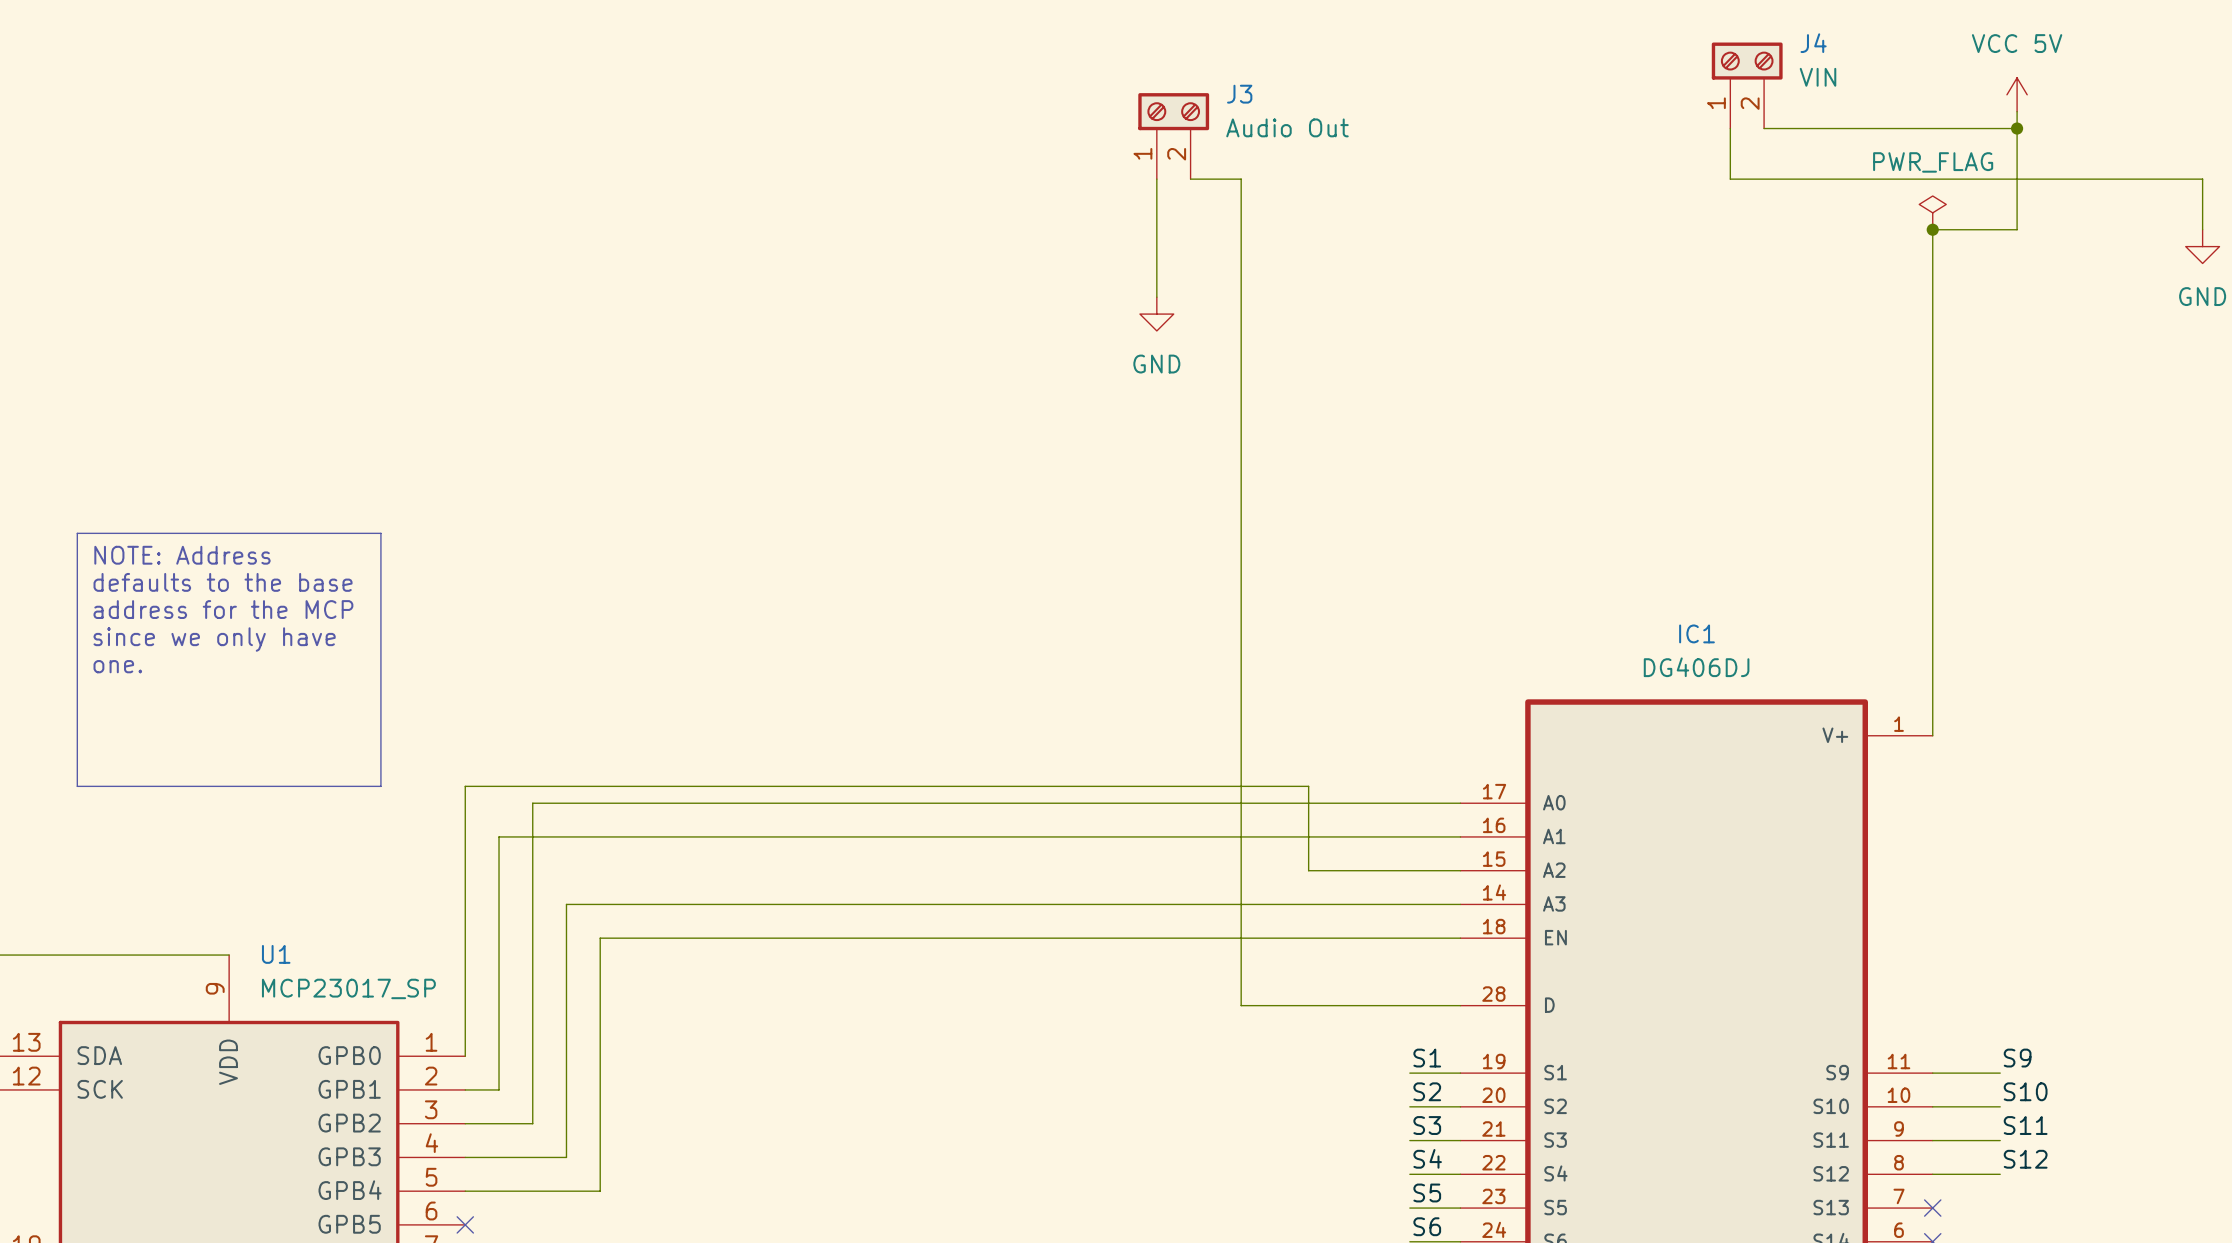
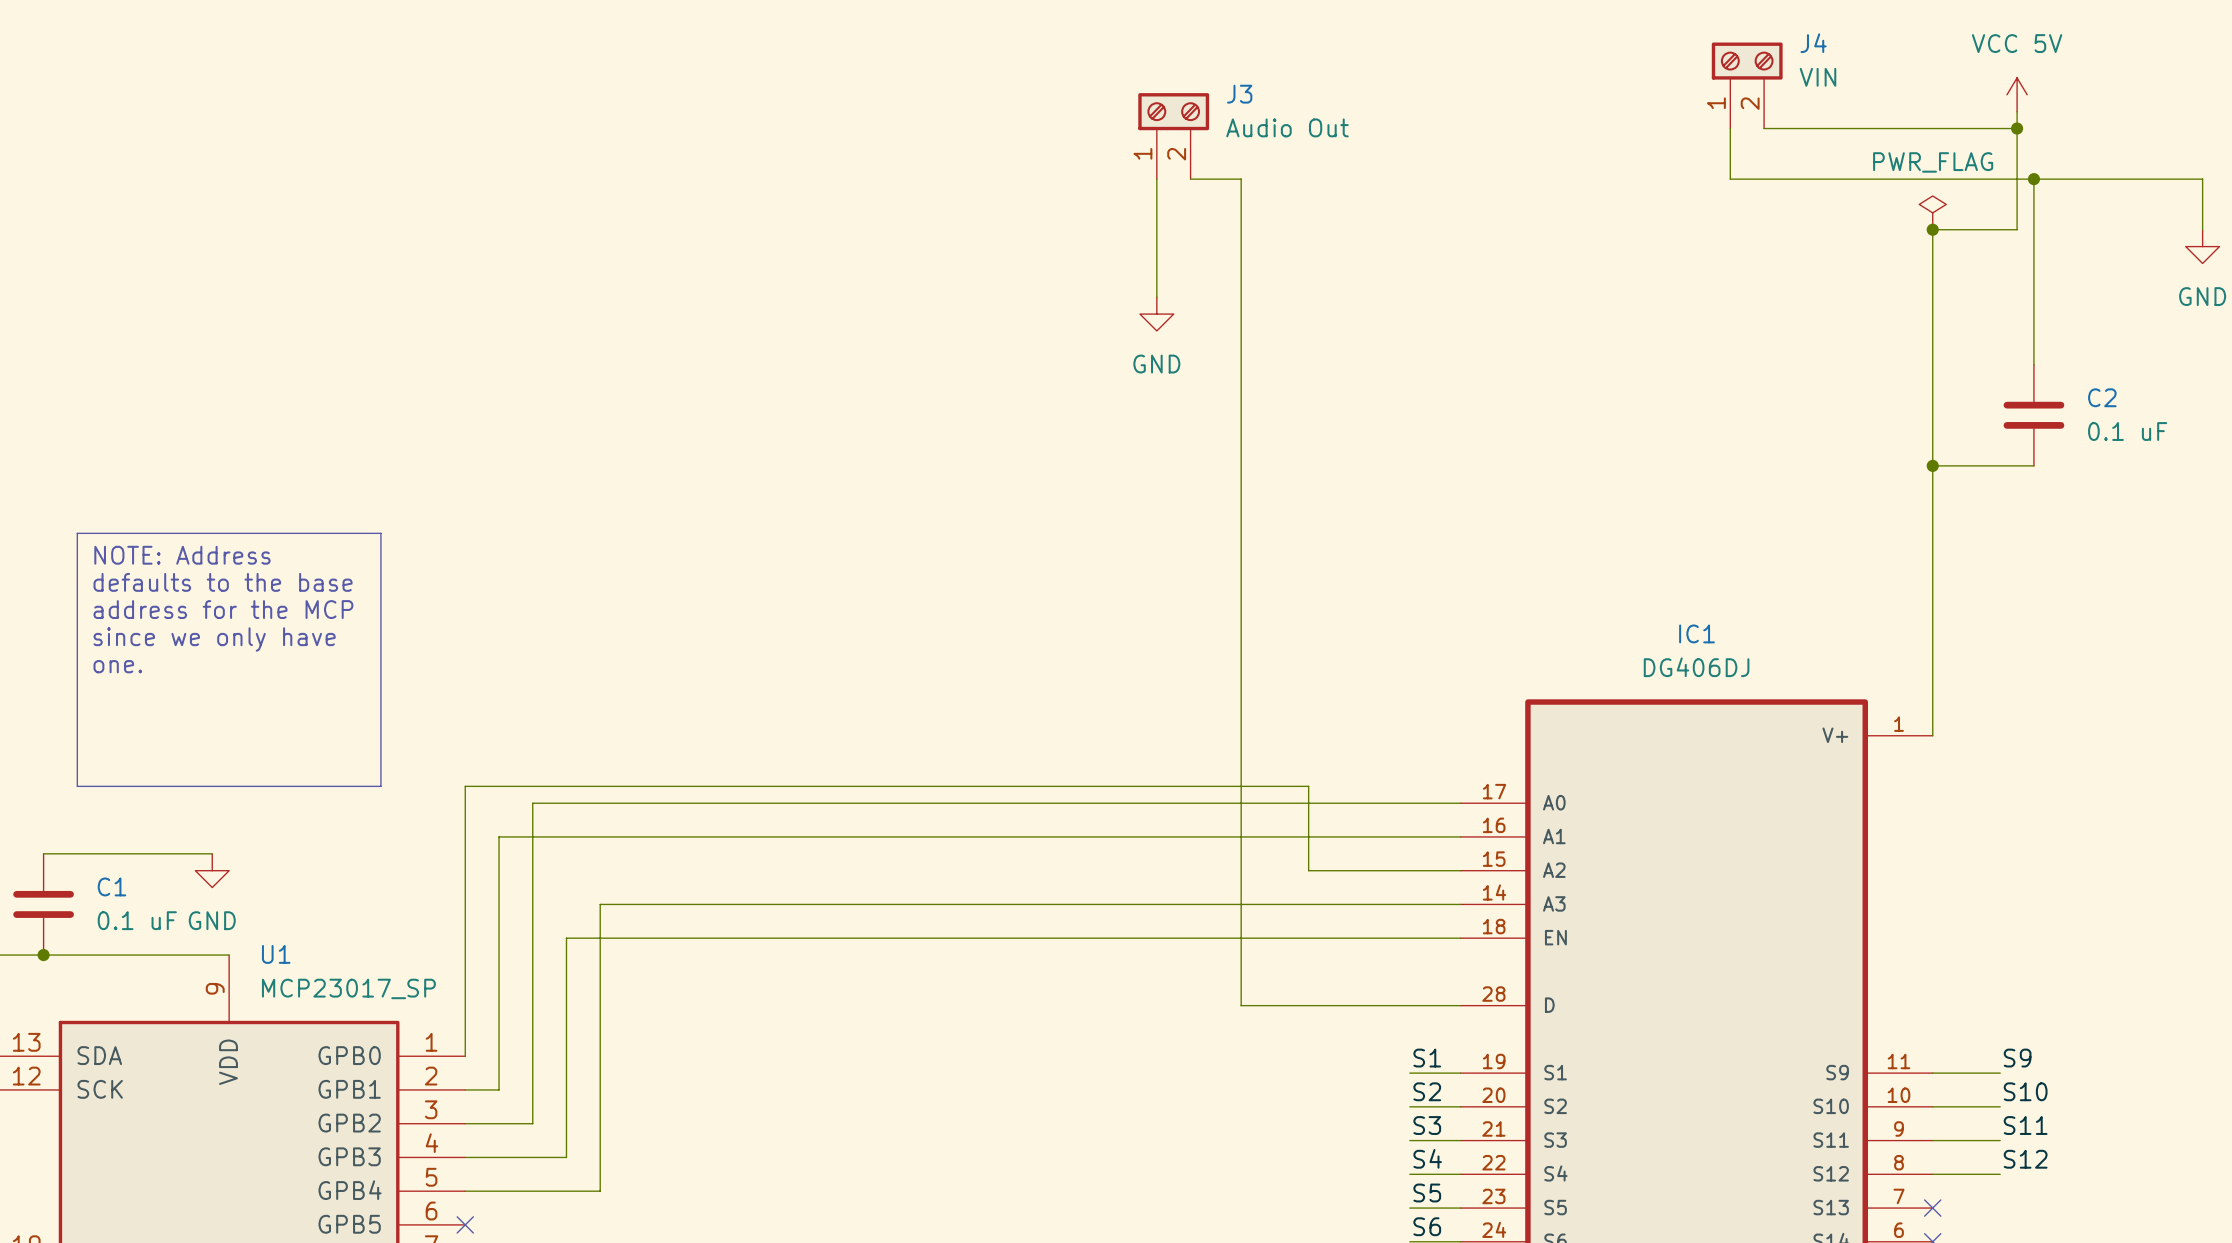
wire: none -> (2033, 179) (2033, 364)
junction: none -> (2033, 179)
C2: none -> 0.1 uF (2033, 415)
wire: none -> (1932, 465) (2033, 465)
junction: none -> (1932, 465)
wire: none -> (43, 853) (212, 853)
power symbol: none -> GND (212, 870)
C1: none -> 0.1 uF (43, 904)
wire: (600, 904) (566, 904) (566, 938) -> (600, 904) (600, 938) (566, 938)
junction: none -> (43, 955)

